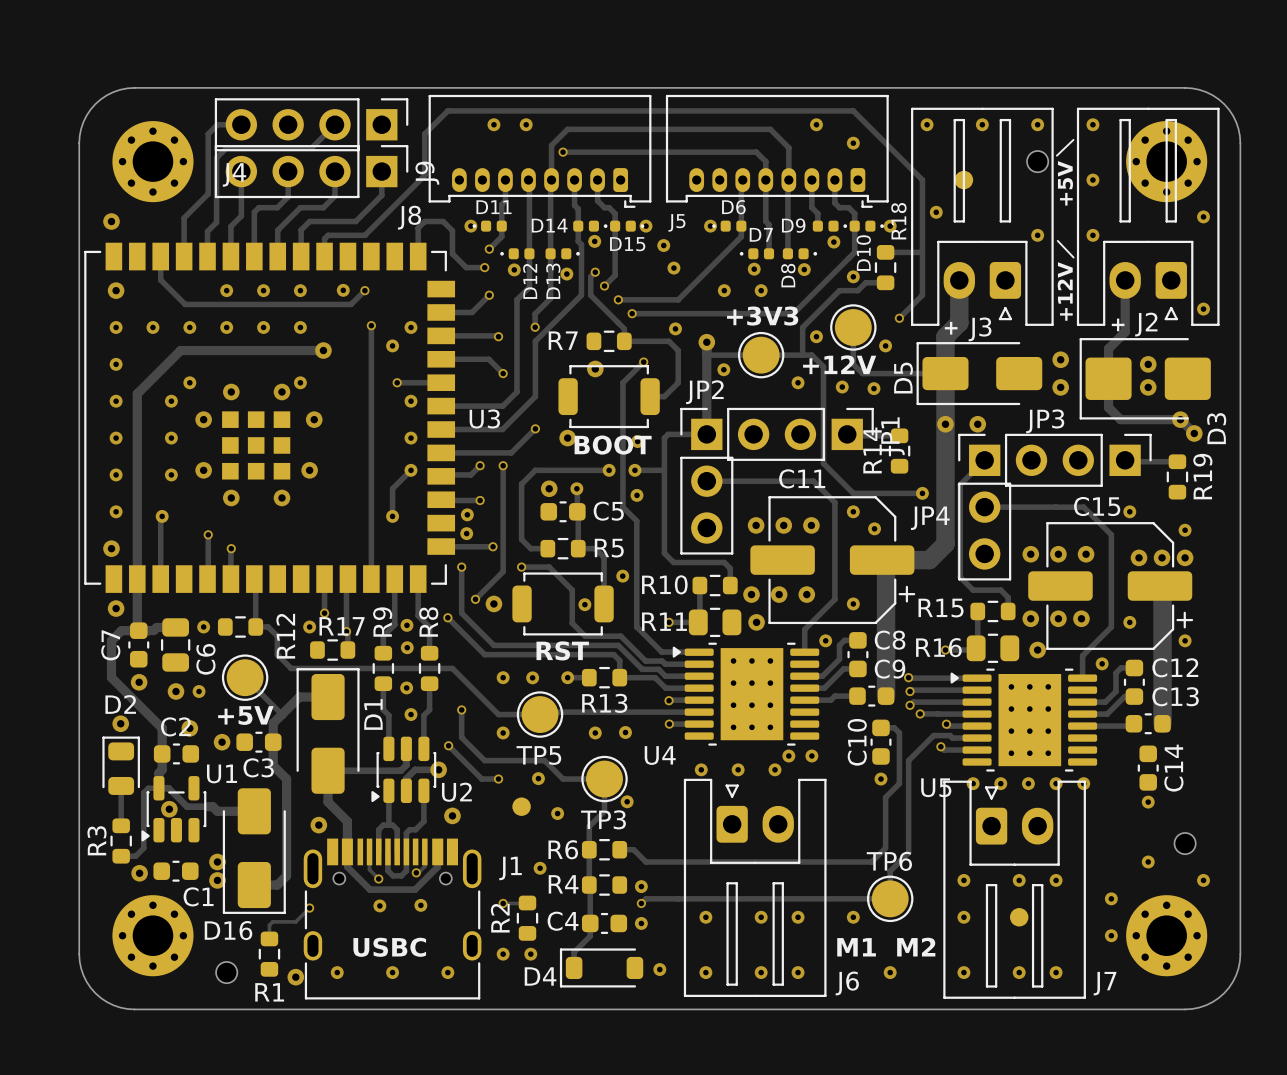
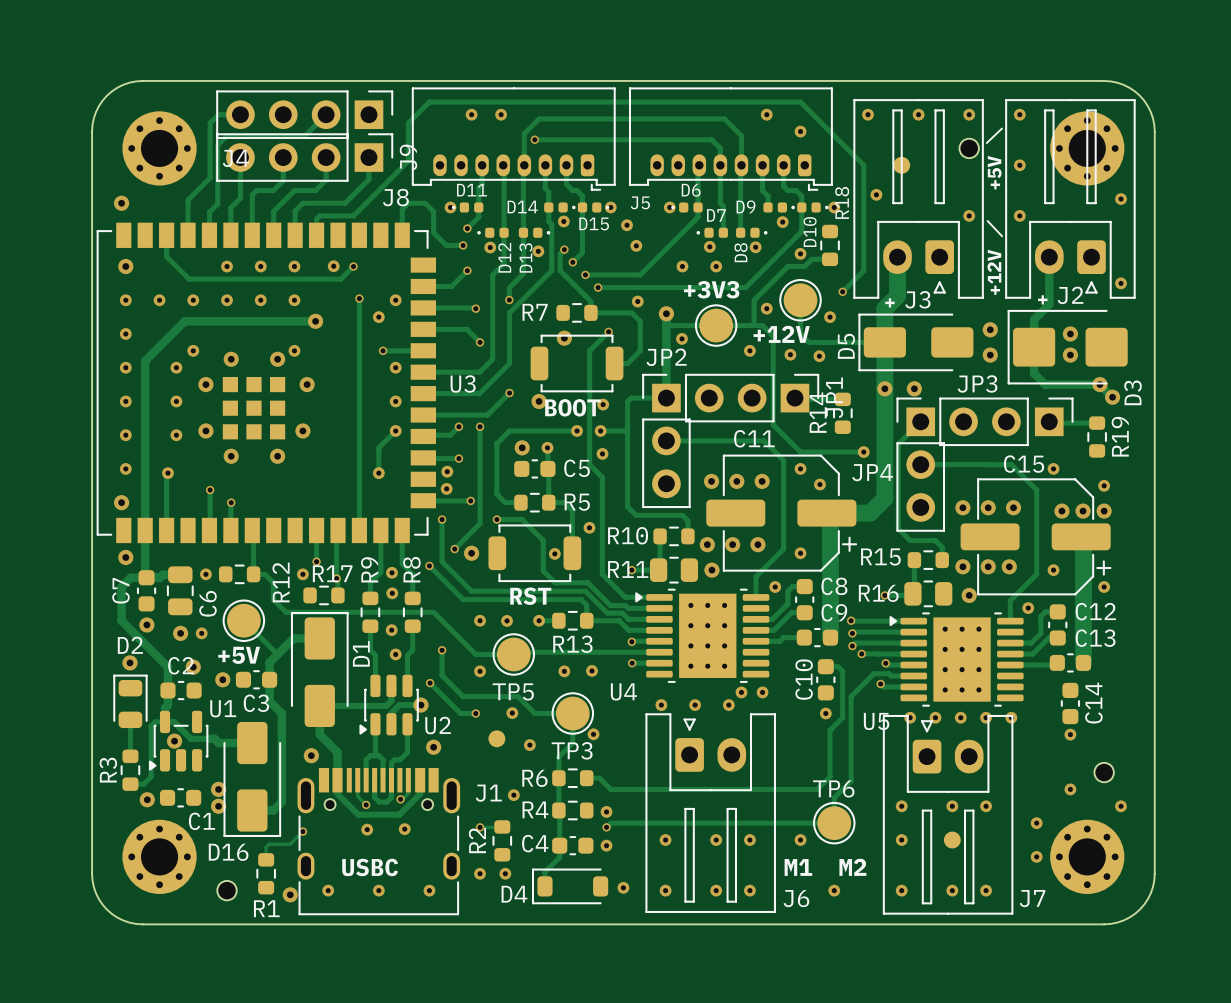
track: (885, 252) (922, 253) -> none

